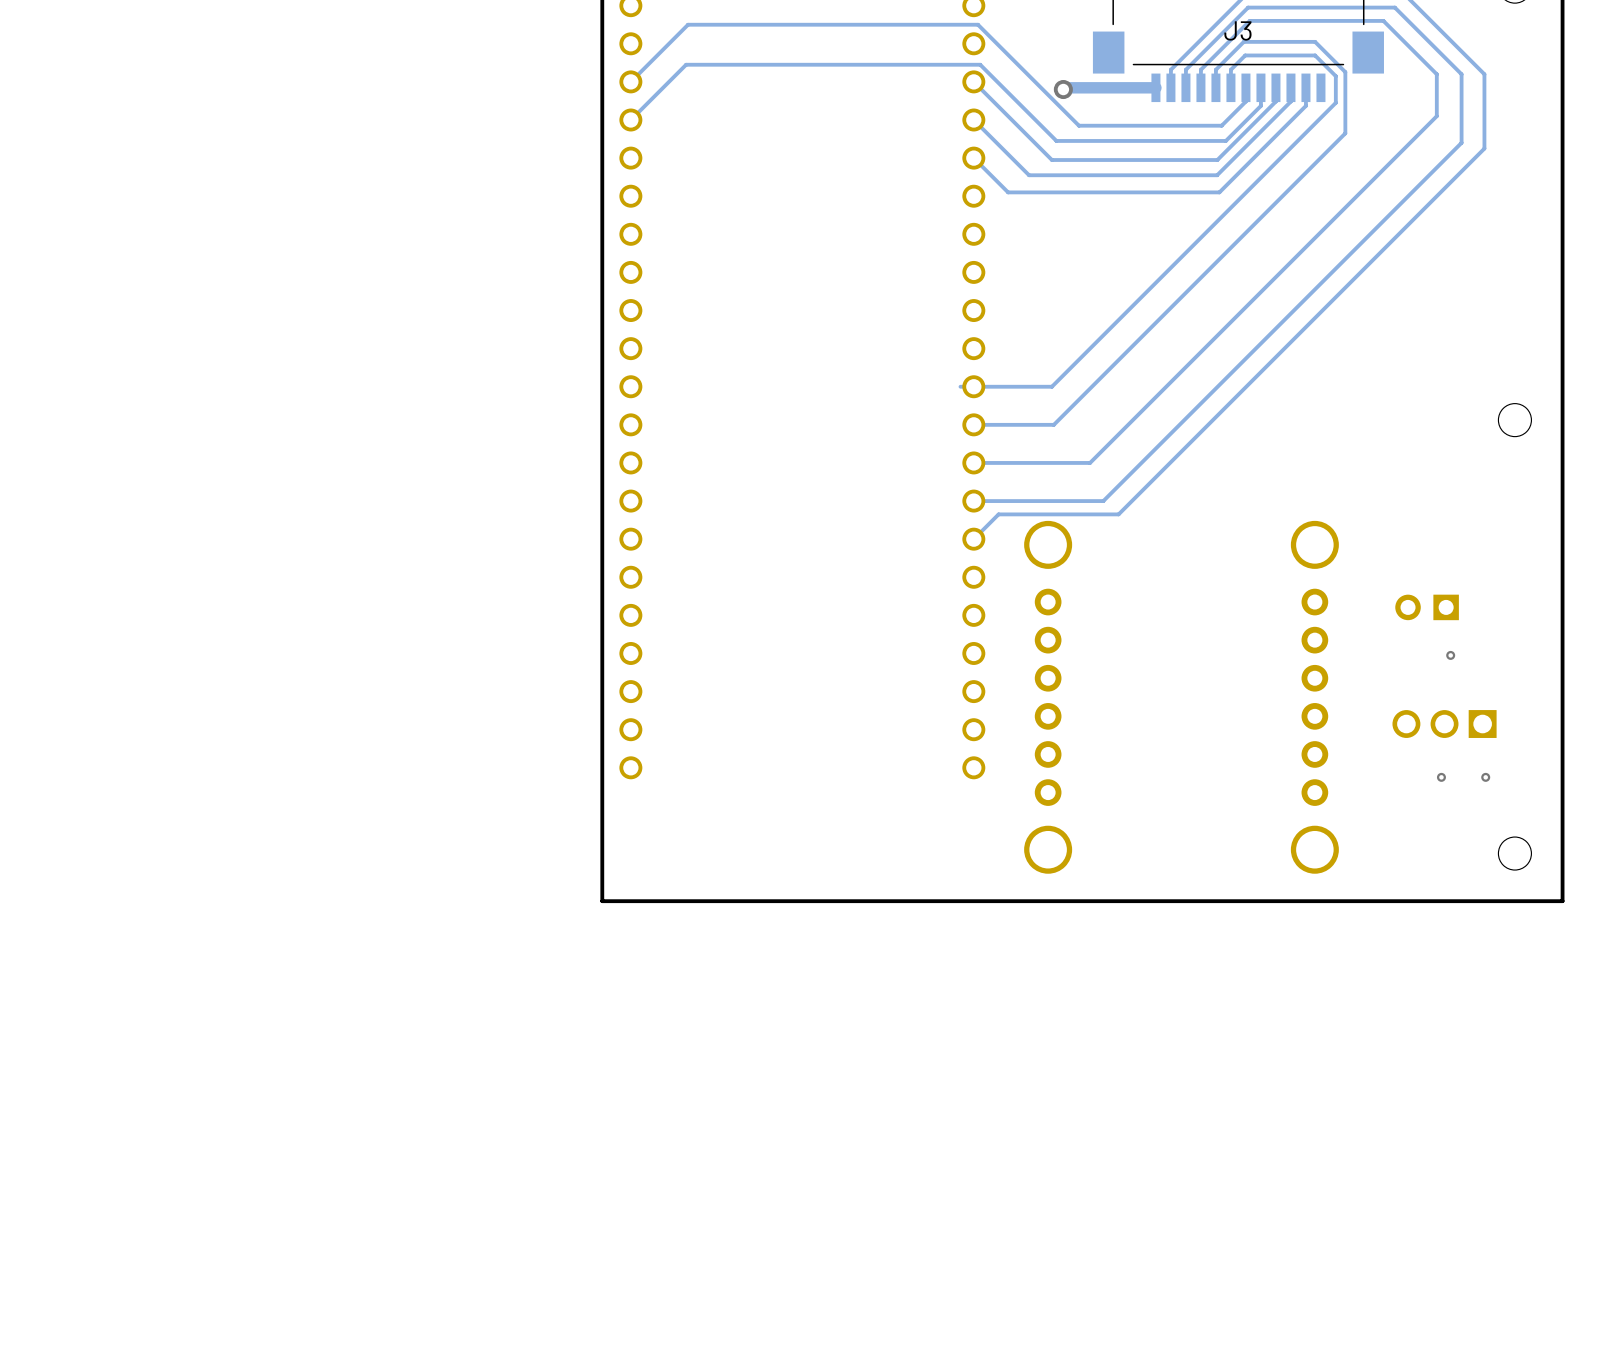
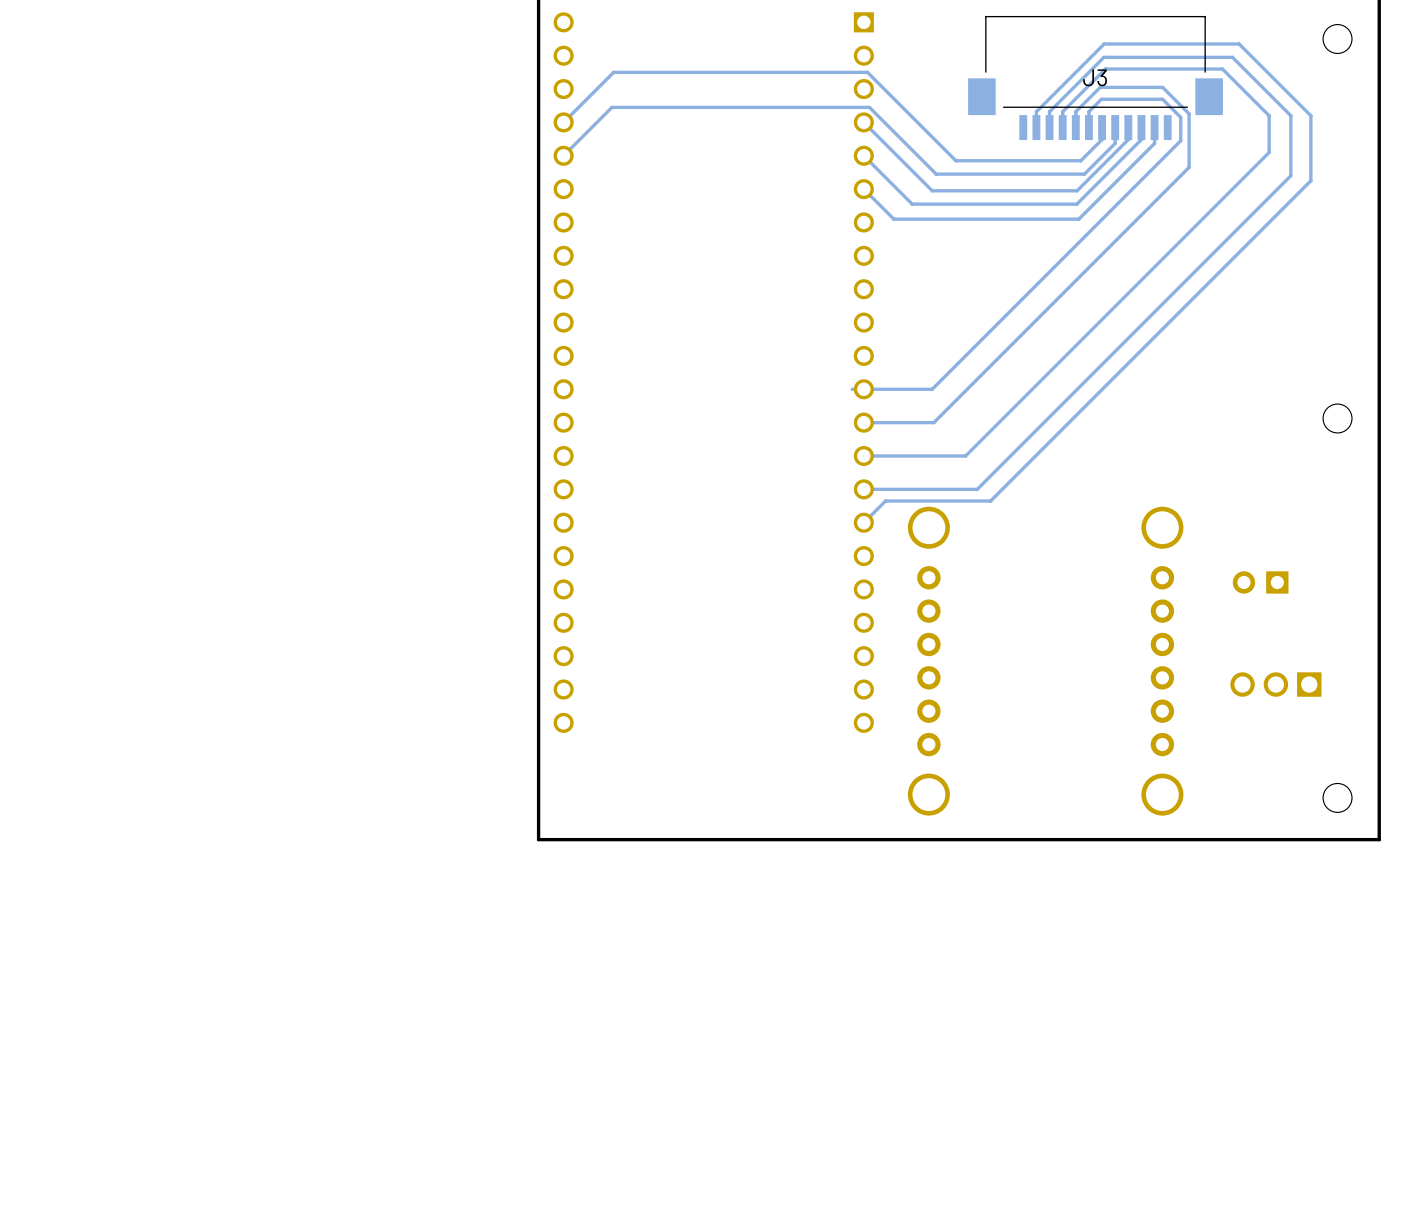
track: (1155, 87) (1065, 87) (1063, 89) -> none
via: (1063, 89) -> none
via: (1450, 655) -> none
via: (1441, 777) -> none
via: (1485, 777) -> none

